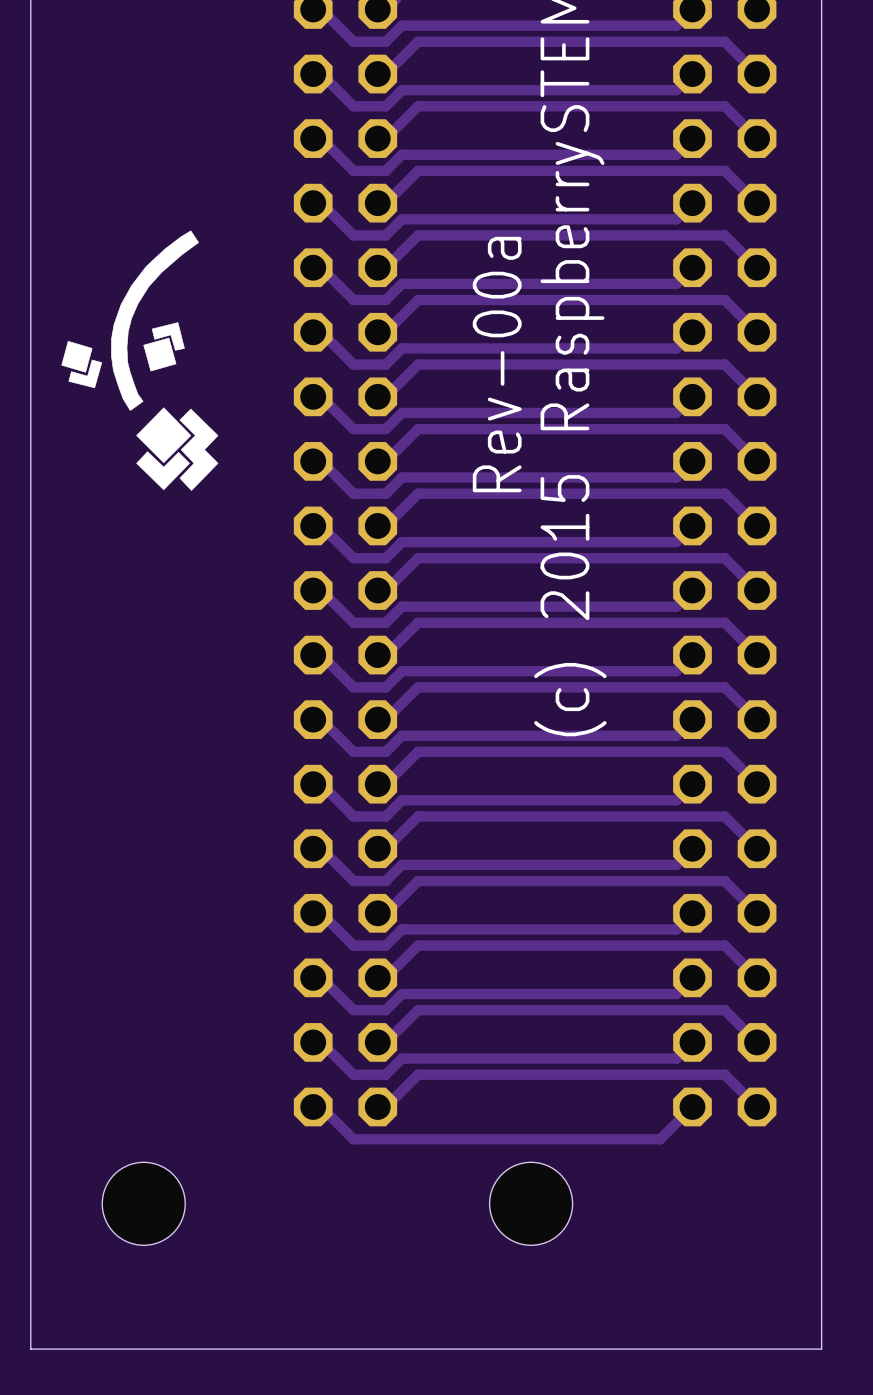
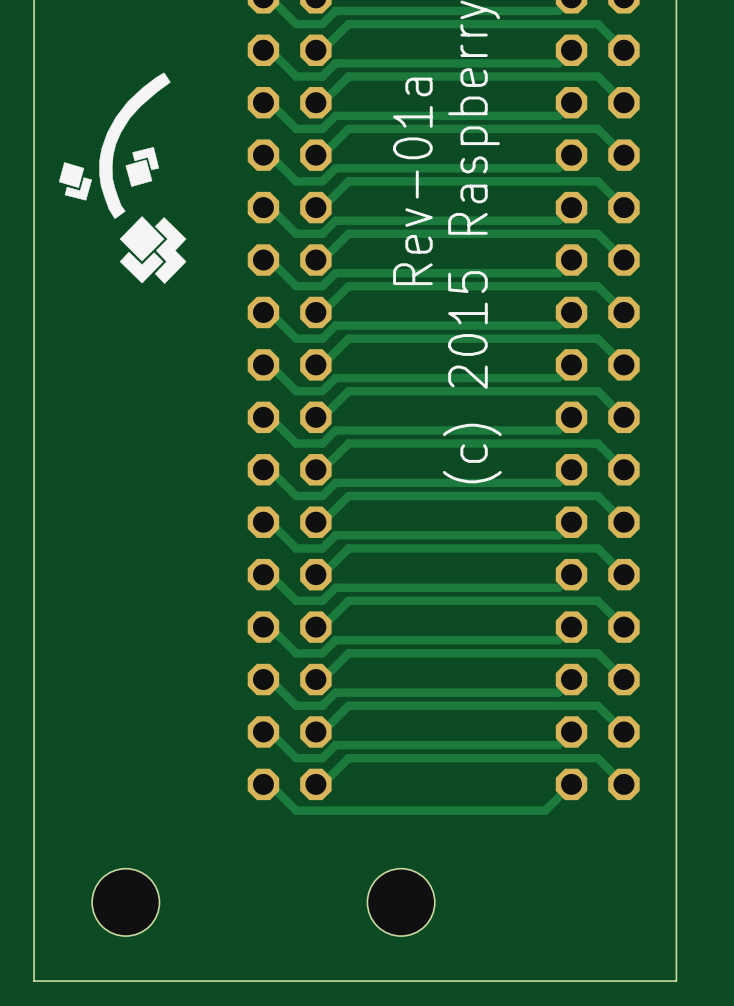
text: Rev-00a (497, 364) -> Rev-01a (412, 181)
hole position: (143, 1203) -> (125, 902)
hole position: (531, 1203) -> (401, 902)

